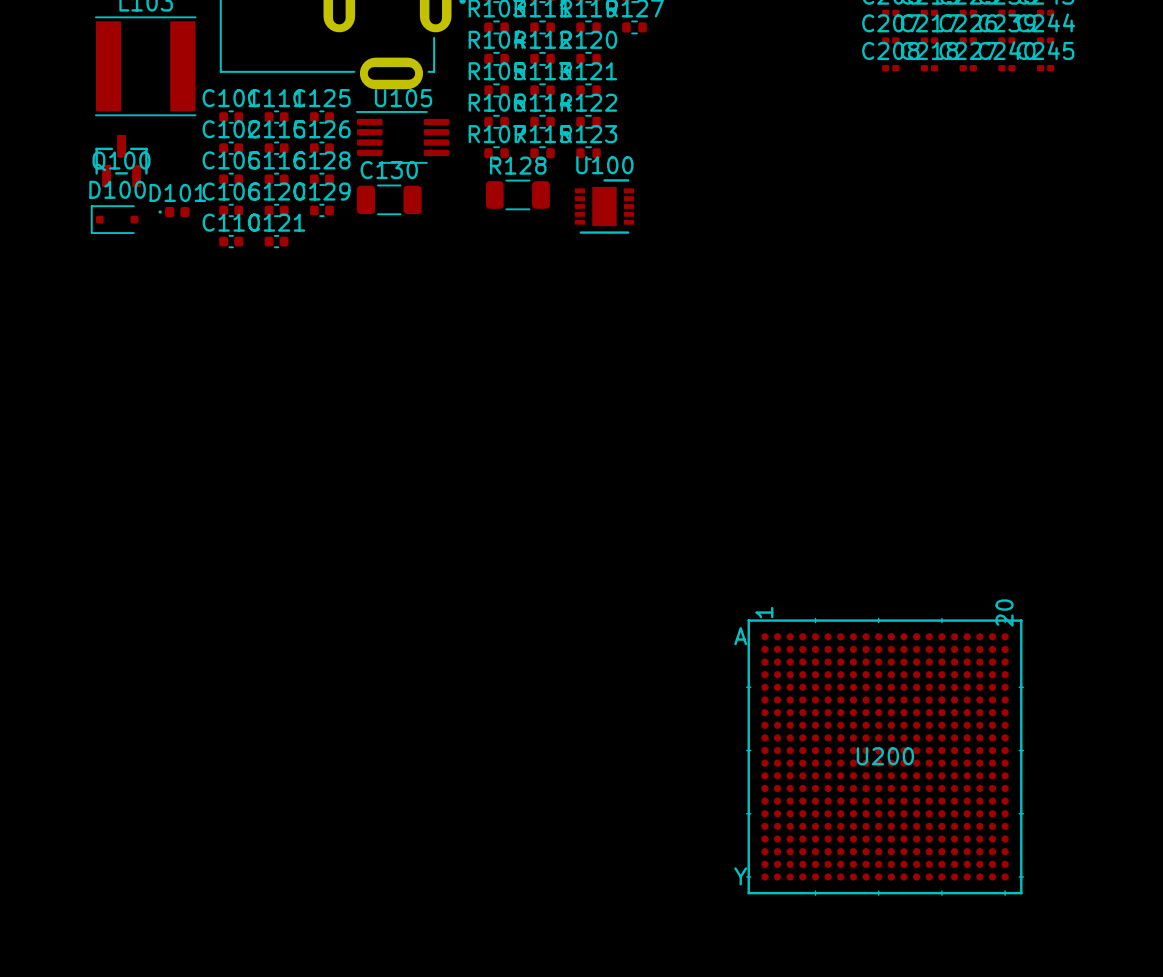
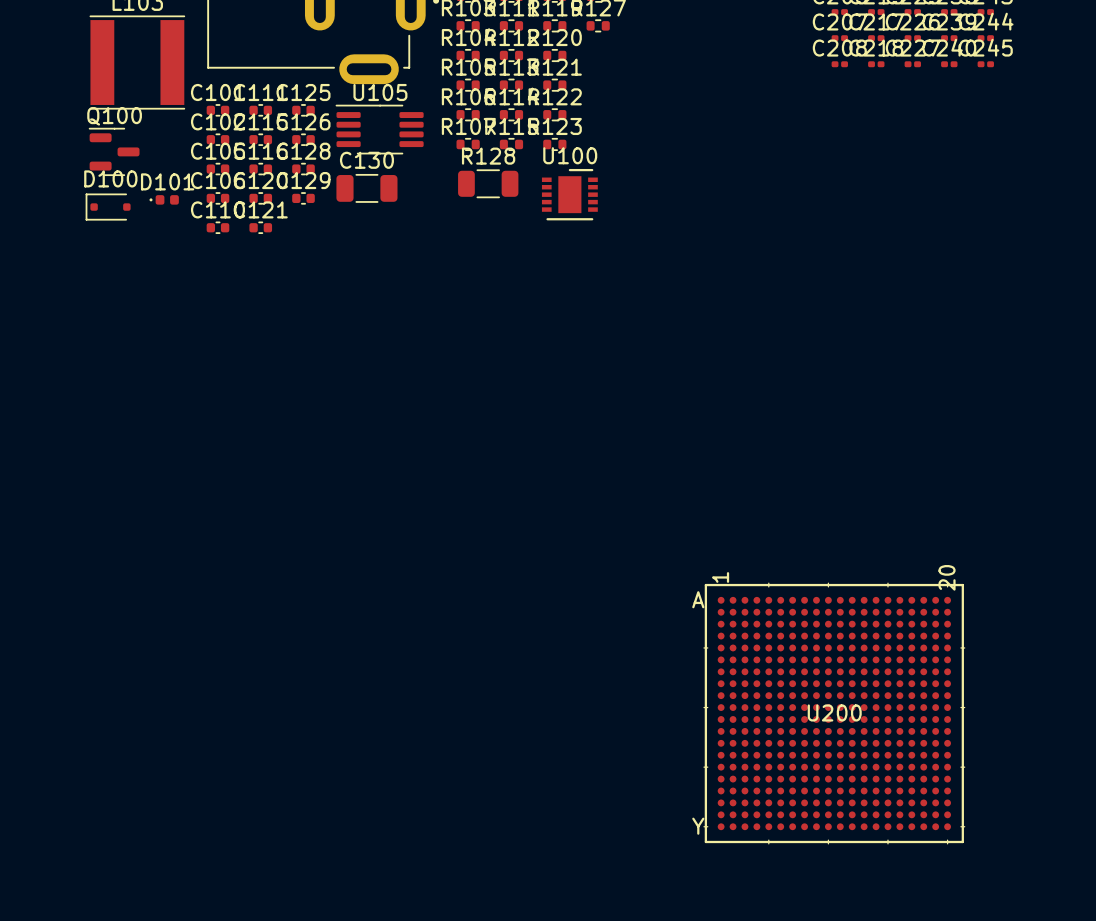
Q100 footprint: [95, 135, 148, 188] -> [88, 127, 140, 177]
Q100 name position: Q100 (121, 161) -> Q100 (114, 116)

